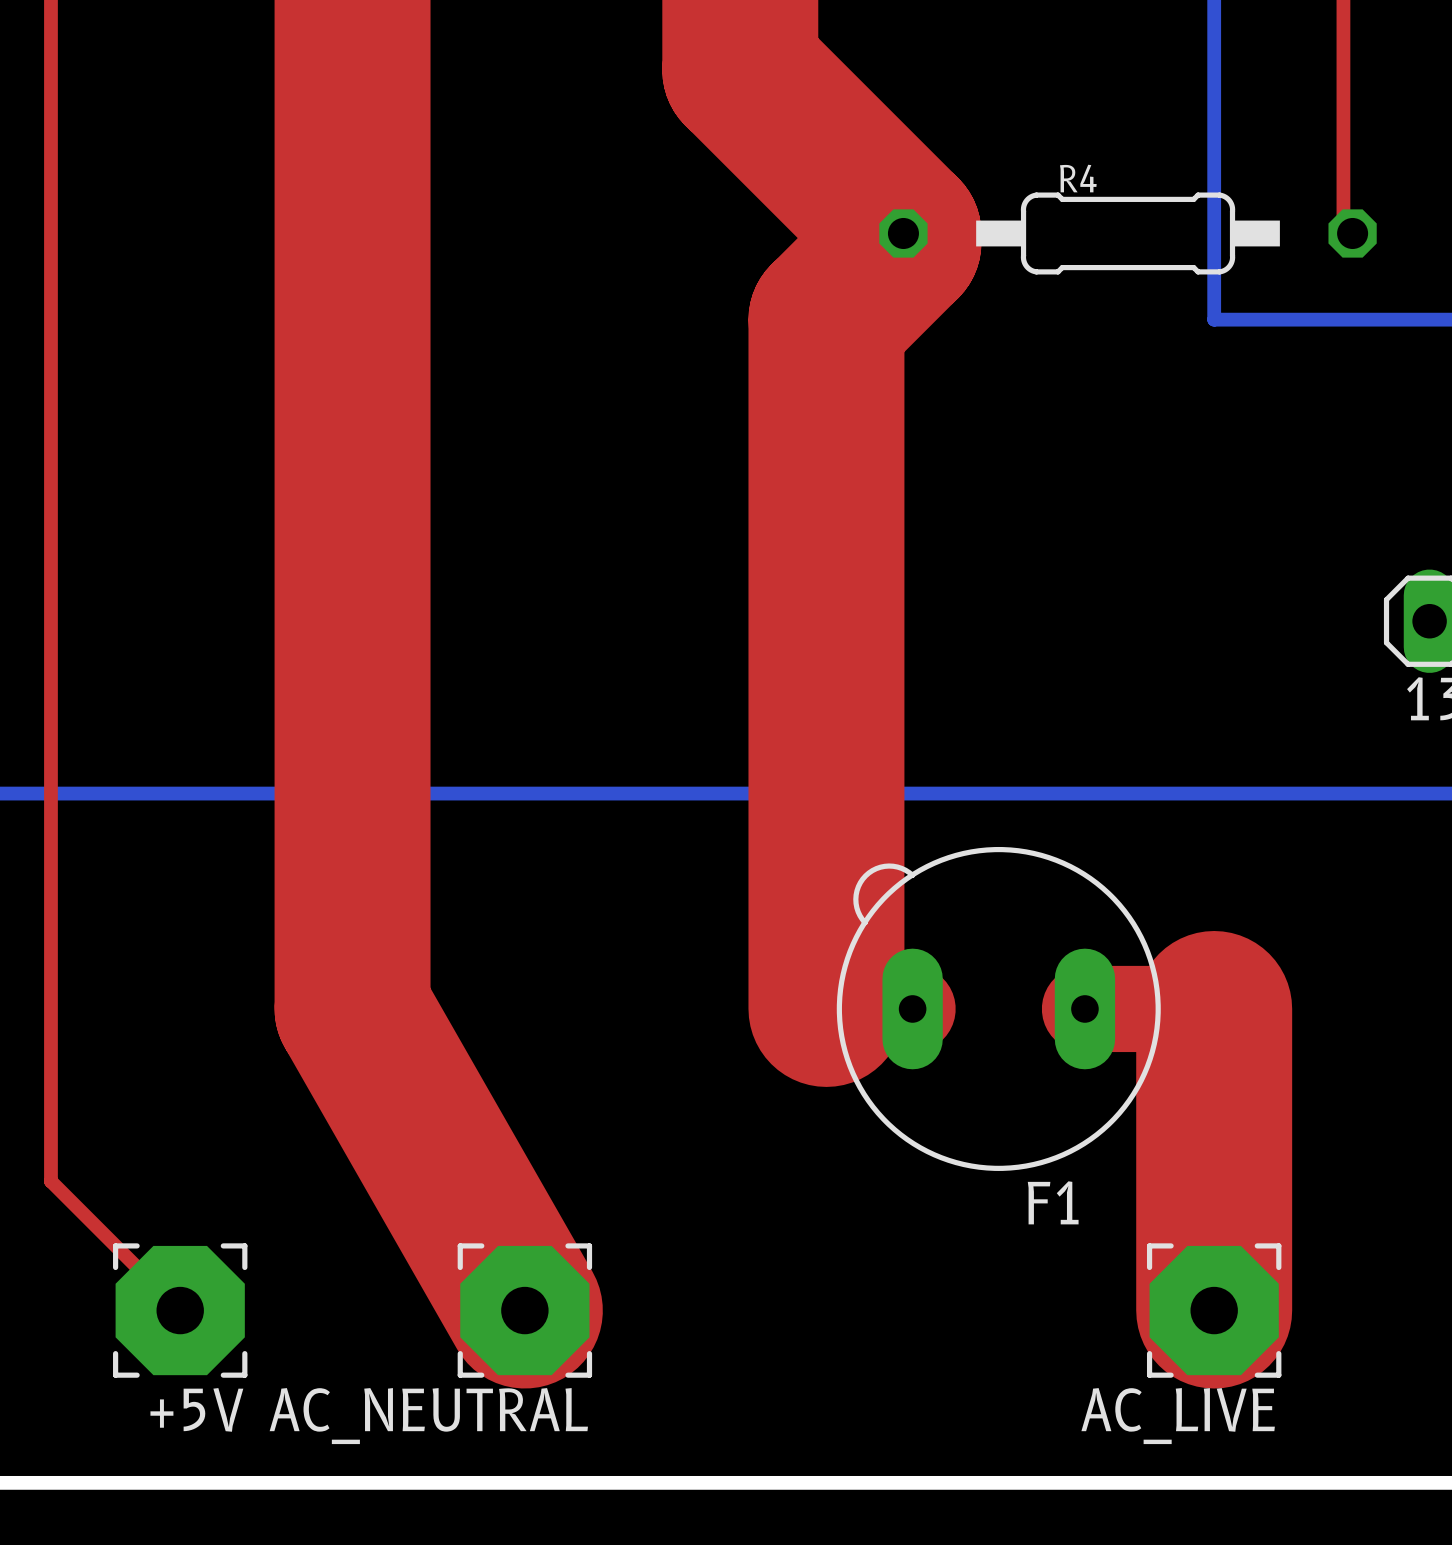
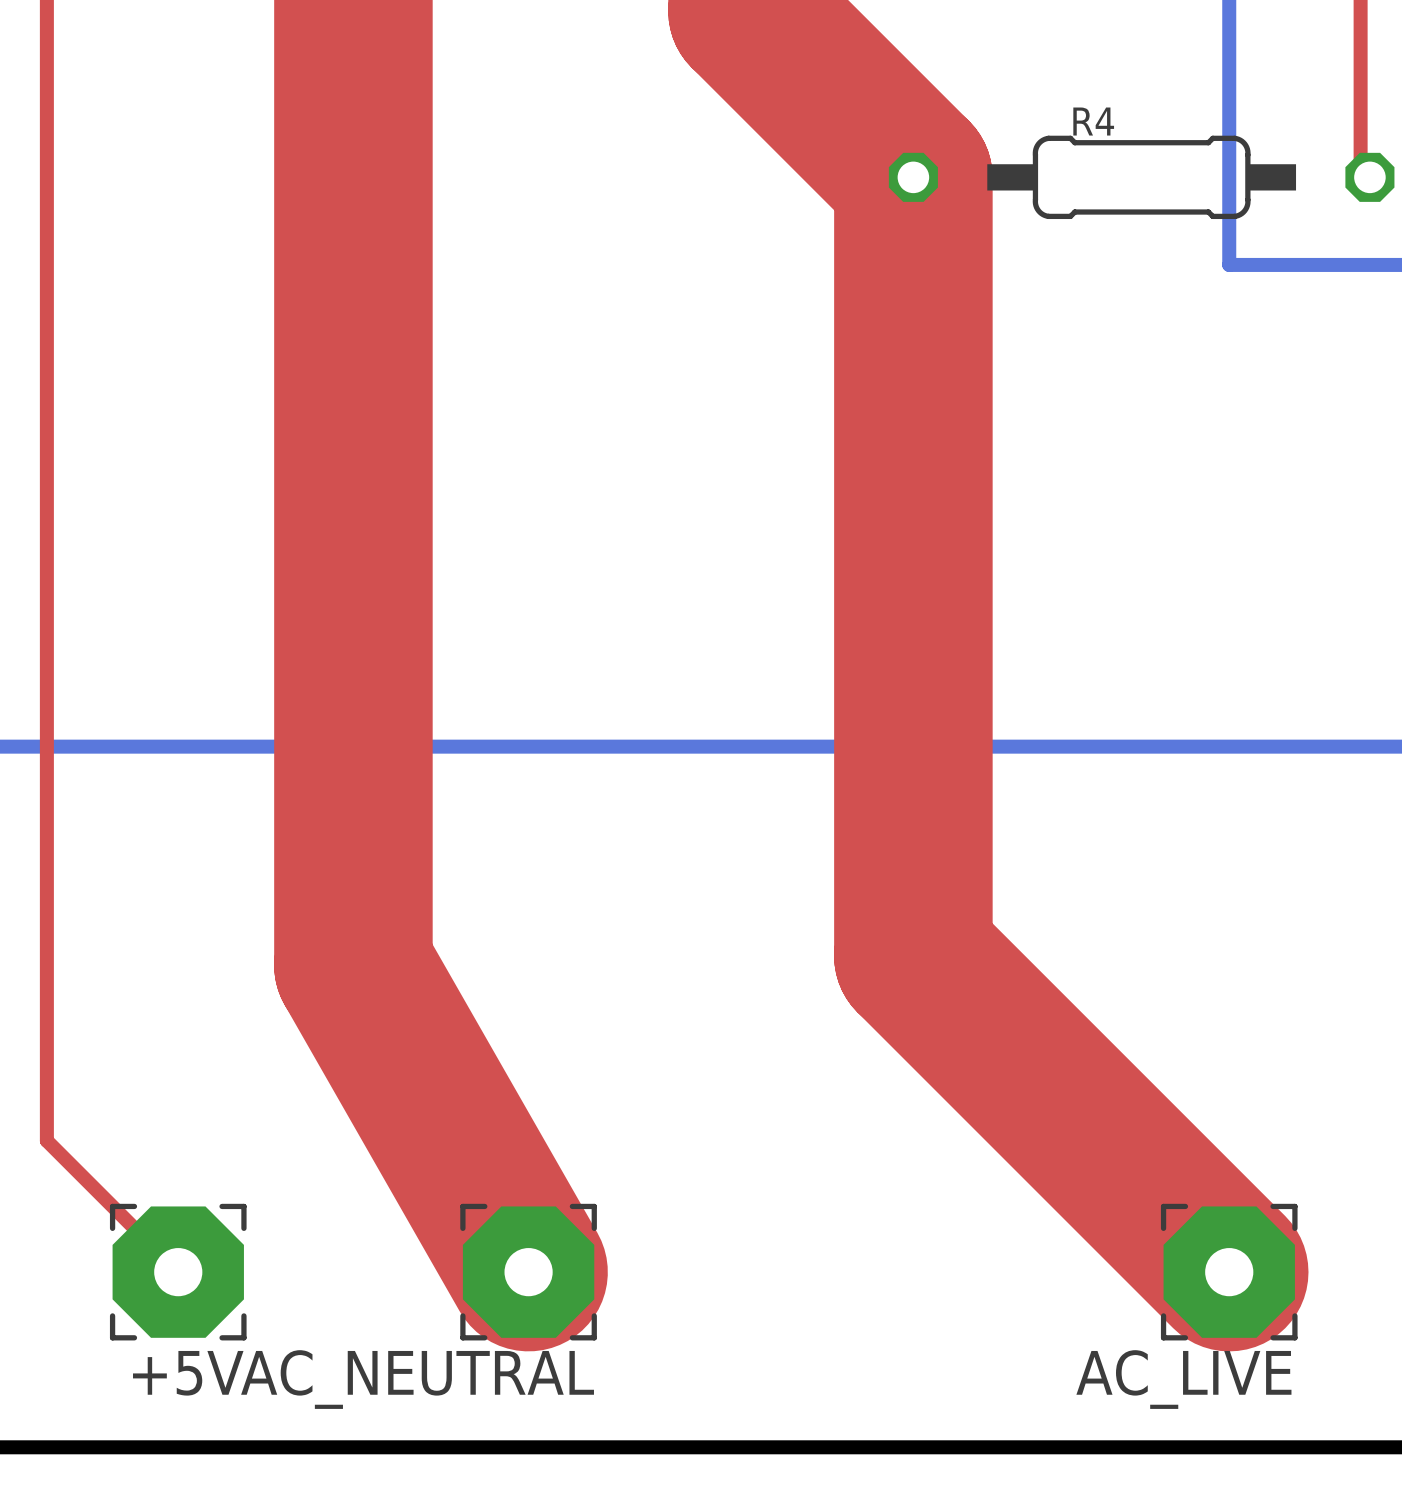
top track: (903, 242) (826, 319) (826, 1008) (912, 1008) -> (913, 186) (913, 956) (1229, 1272)
F1: (998, 1008) -> none
top track: (1084, 1008) (1214, 1008) (1214, 1310) -> none

